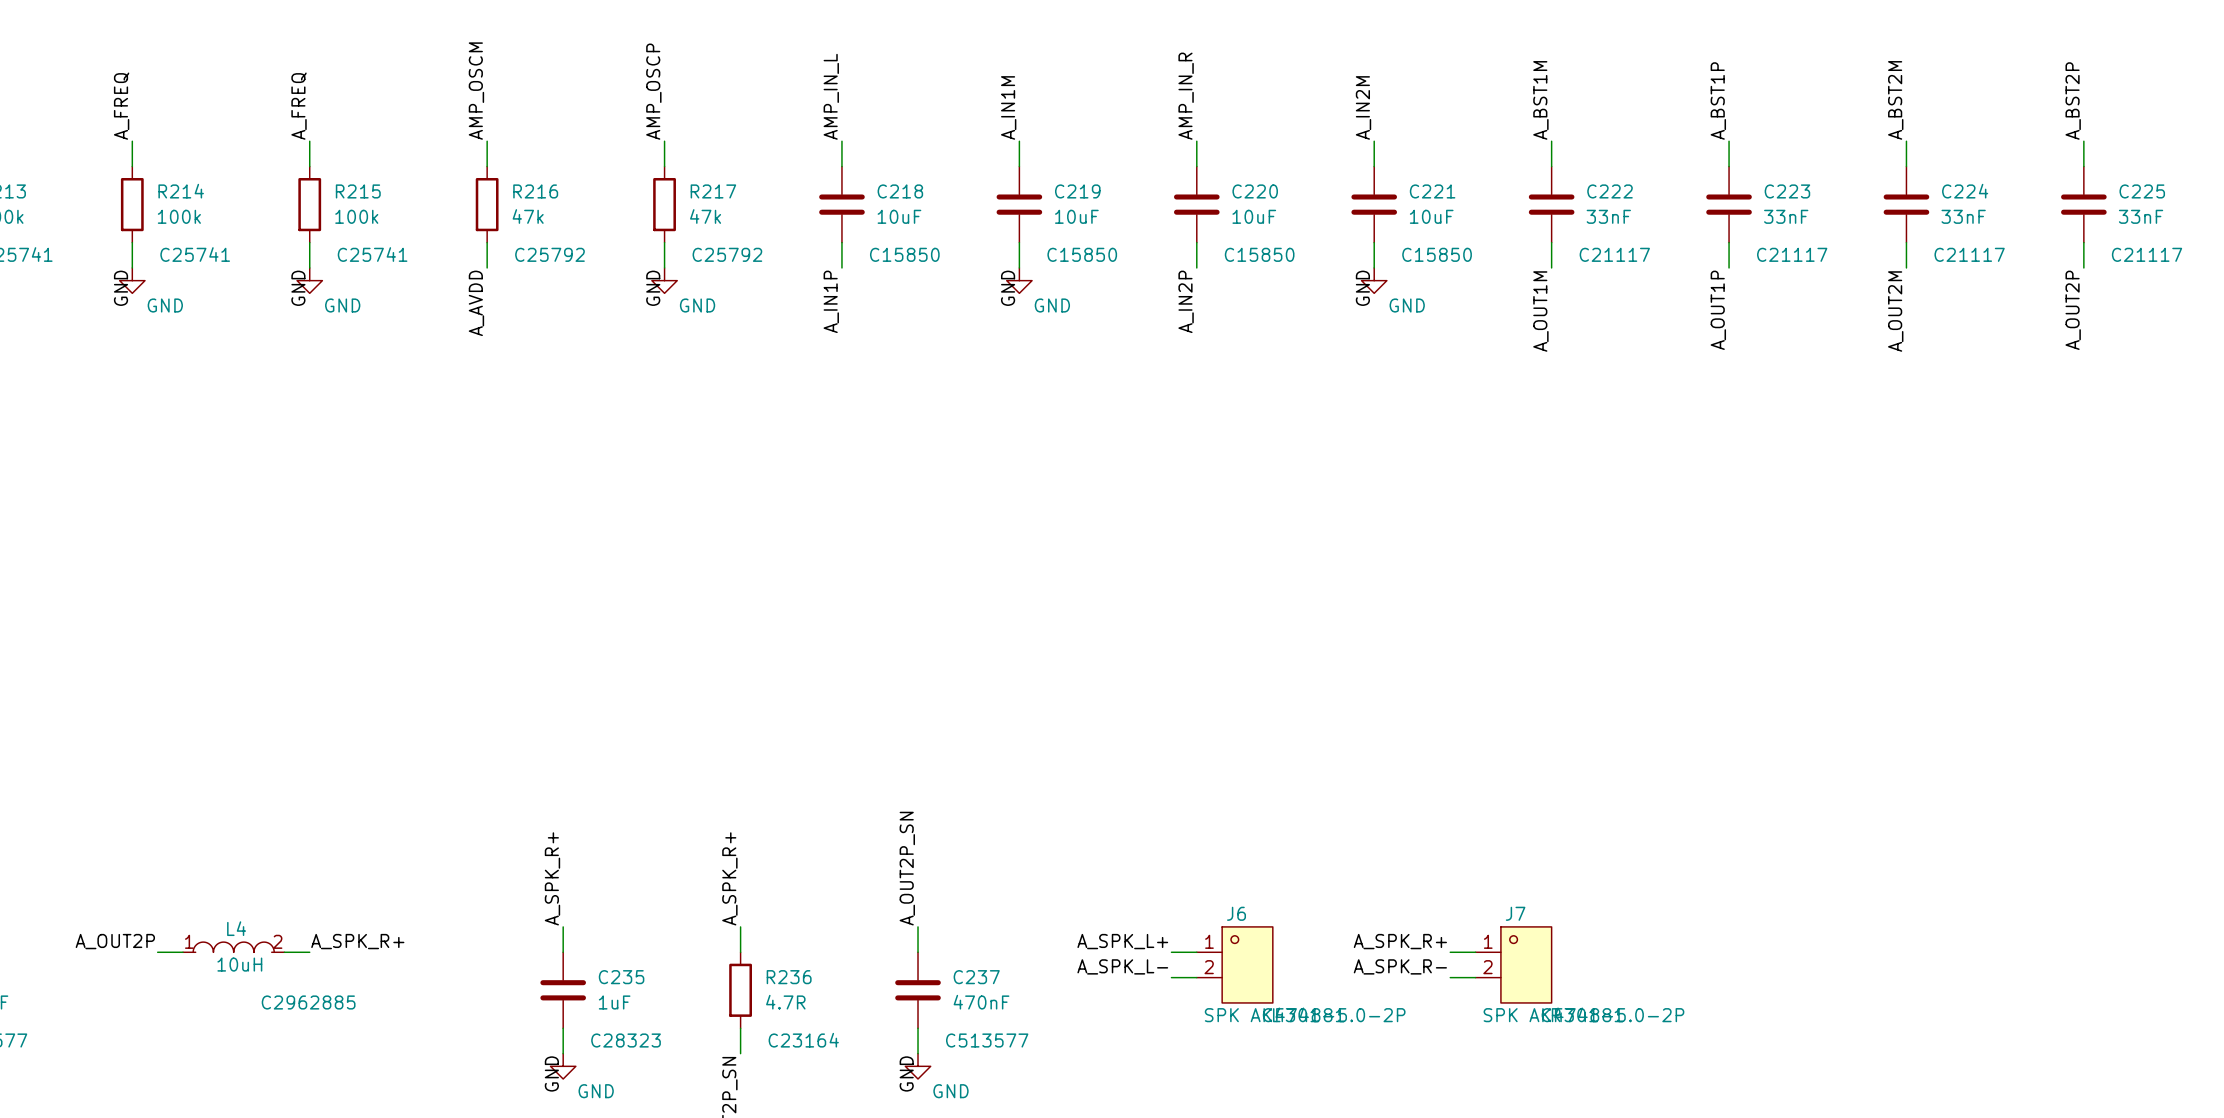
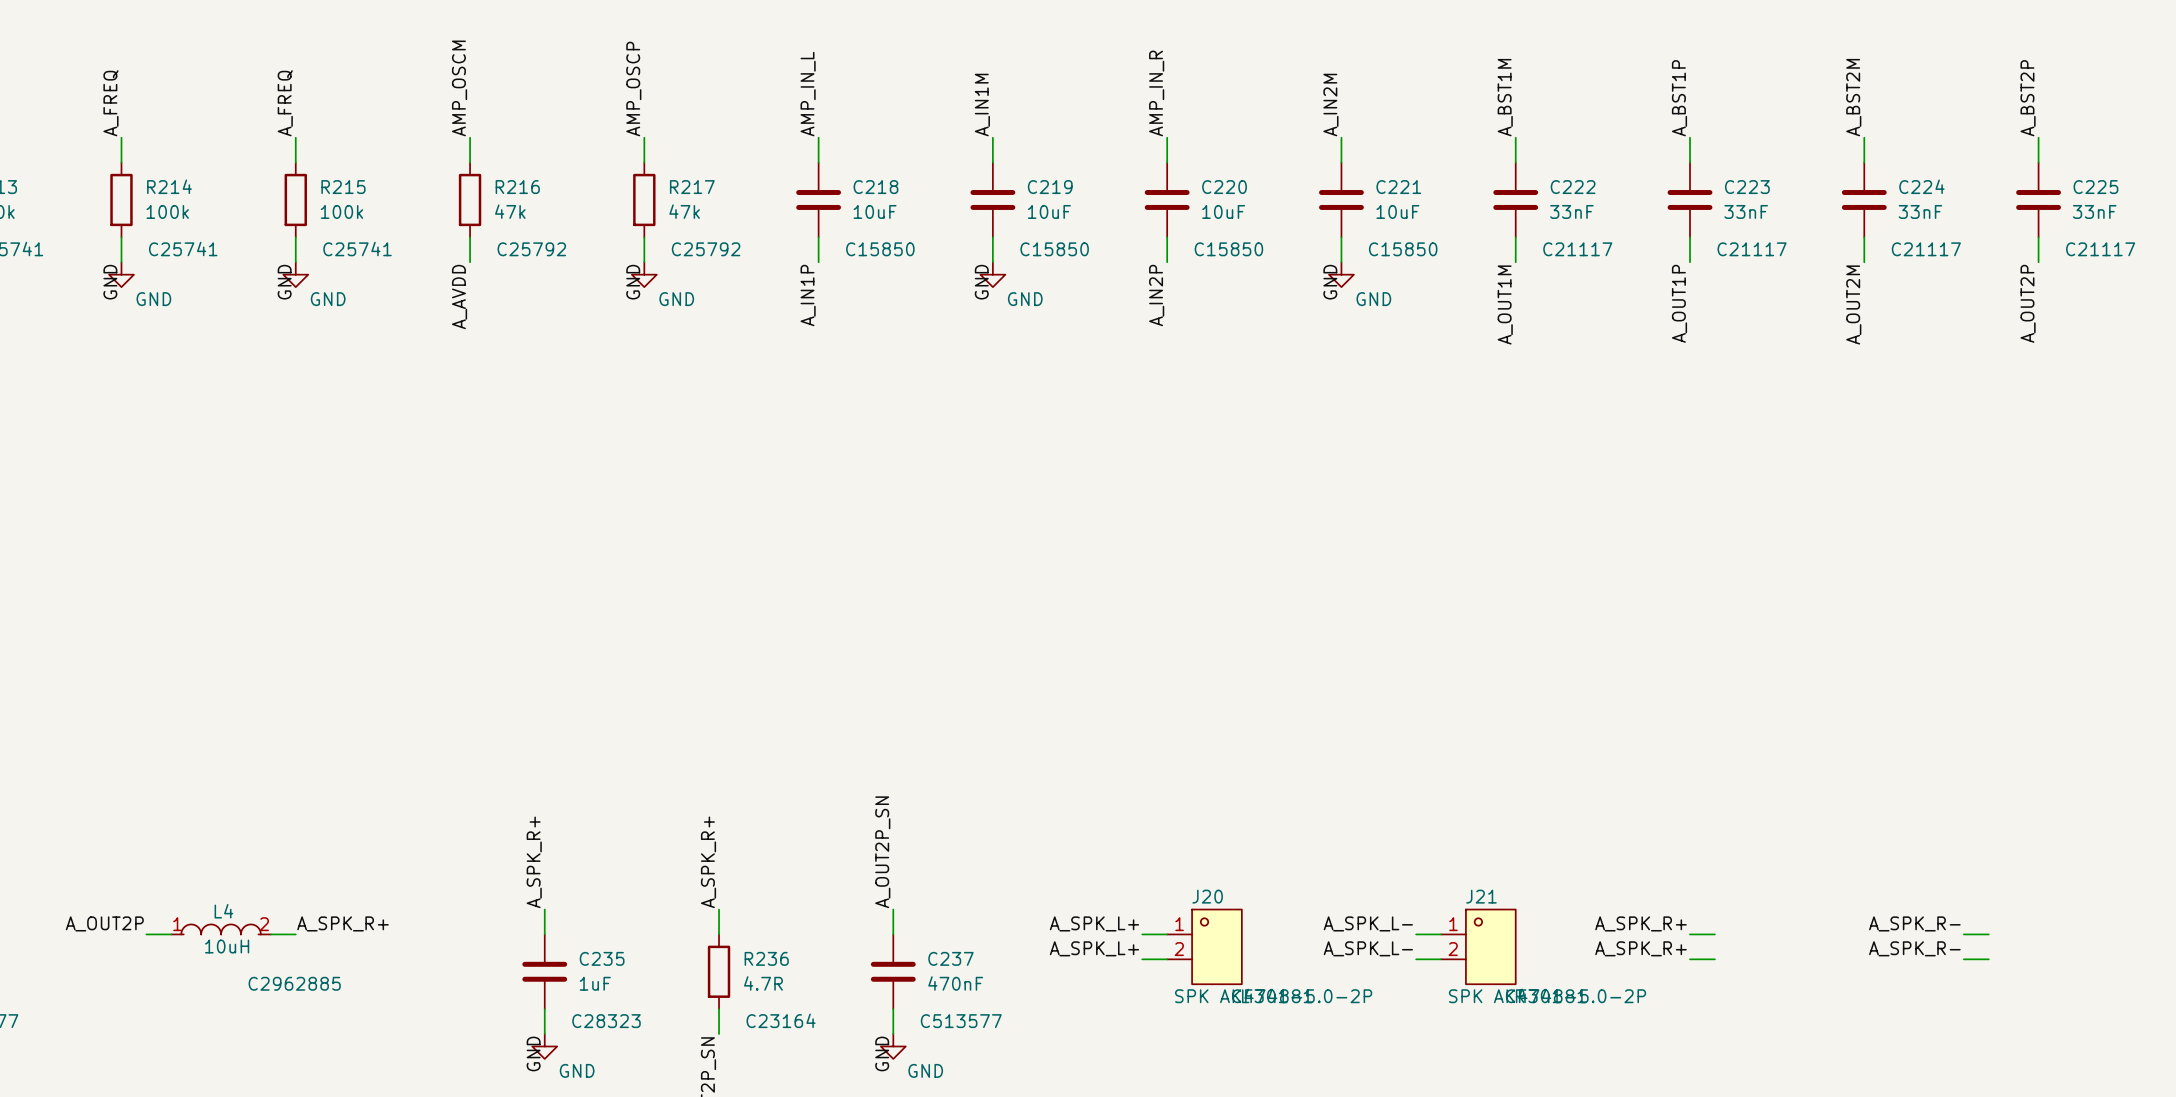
J6 name: J6 (1236, 913) -> J20 (1207, 896)
J7 name: J7 (1515, 913) -> J21 (1481, 896)
label: A_SPK_R+ (1400, 941) -> A_SPK_L- (1368, 923)
label: none -> A_SPK_R+ (1641, 923)
label: none -> A_SPK_R- (1914, 923)
wire: none -> (1690, 934) (1714, 934)
wire: none -> (1963, 934) (1988, 934)
label: A_SPK_L- (1122, 966) -> A_SPK_L+ (1094, 948)
label: A_SPK_R- (1400, 966) -> A_SPK_L- (1368, 948)
label: none -> A_SPK_R+ (1641, 948)
label: none -> A_SPK_R- (1914, 948)
wire: none -> (1690, 959) (1714, 959)
wire: none -> (1963, 959) (1988, 959)

